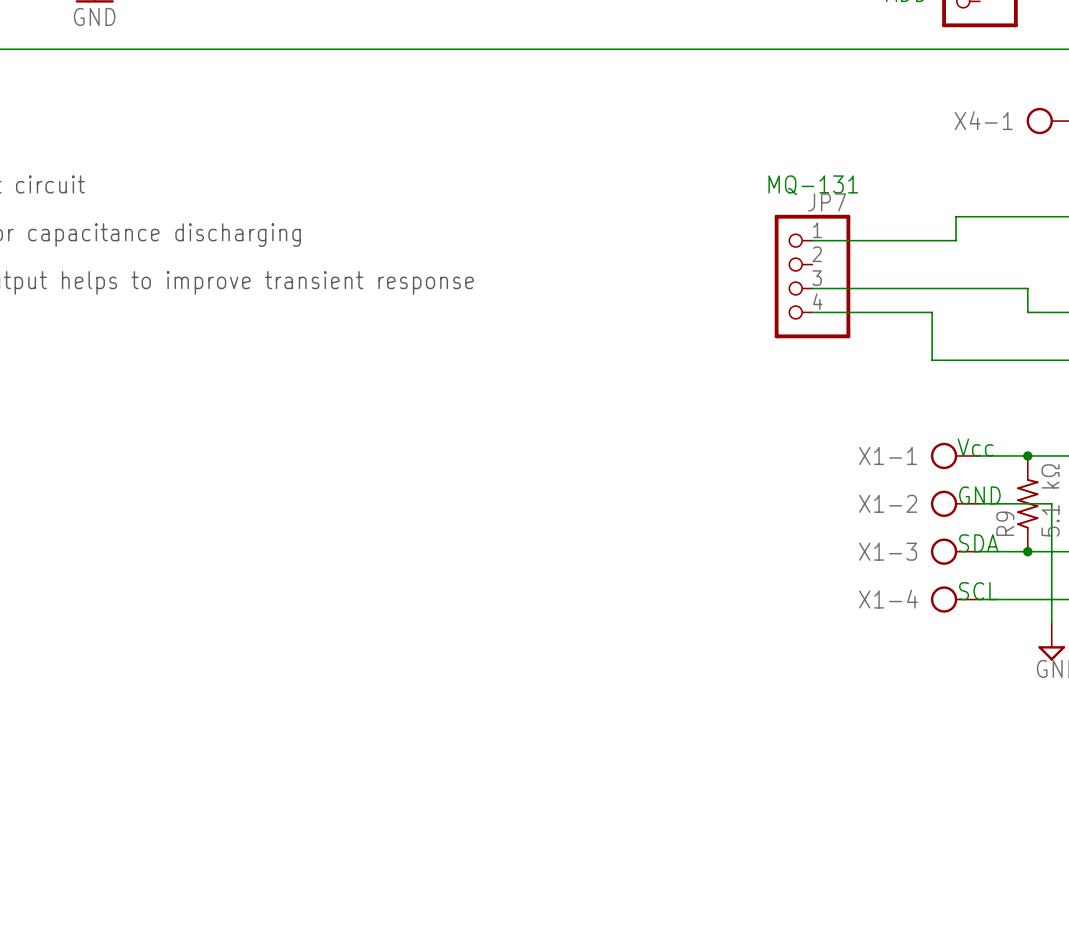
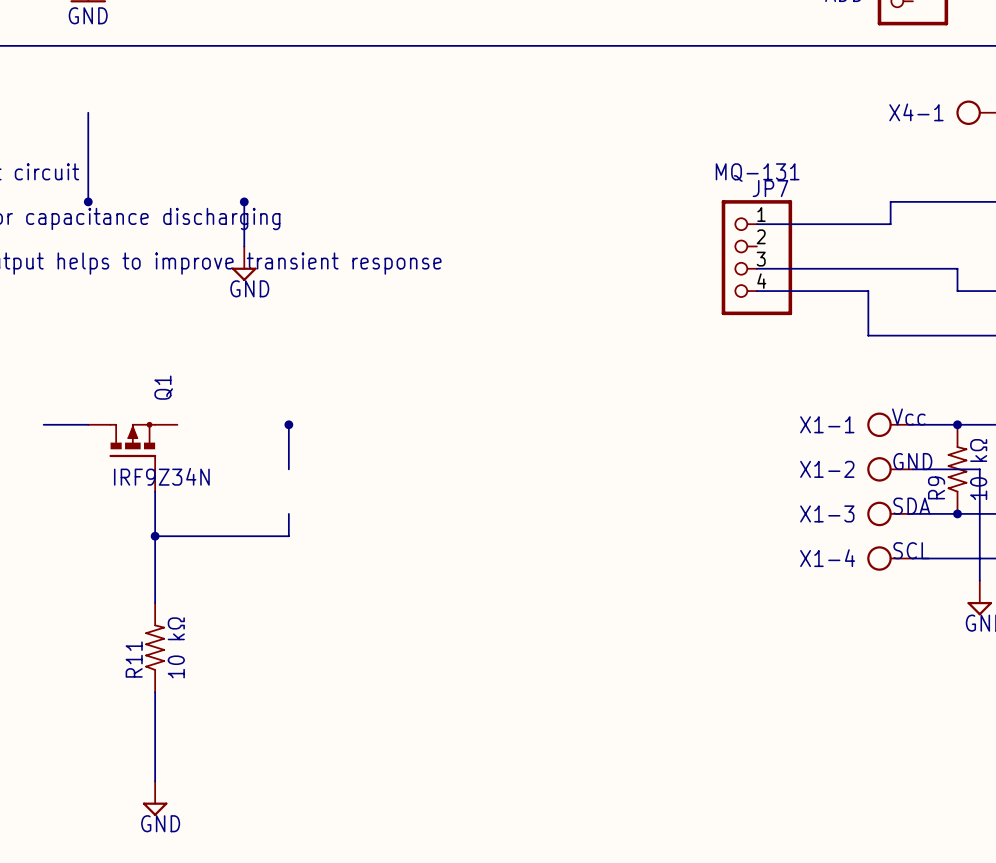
wire: none -> (88, 112) (88, 201)
junction: none -> (88, 201)
wire: none -> (244, 201) (244, 246)
junction: none -> (244, 201)
power symbol: none -> GND (244, 263)
wire: none -> (43, 424) (88, 424)
wire: none -> (288, 424) (288, 469)
junction: none -> (288, 424)
Q1: none -> IRF9Z34N (132, 456)
R9 value: 5.1 kΩ (1050, 500) -> 10 kΩ (978, 469)
wire: none -> (155, 491) (155, 603)
wire: none -> (288, 513) (288, 536) (155, 536)
junction: none -> (155, 536)
R11: none -> 10 kΩ (155, 647)
wire: none -> (155, 692) (155, 781)
power symbol: none -> GND (155, 798)

